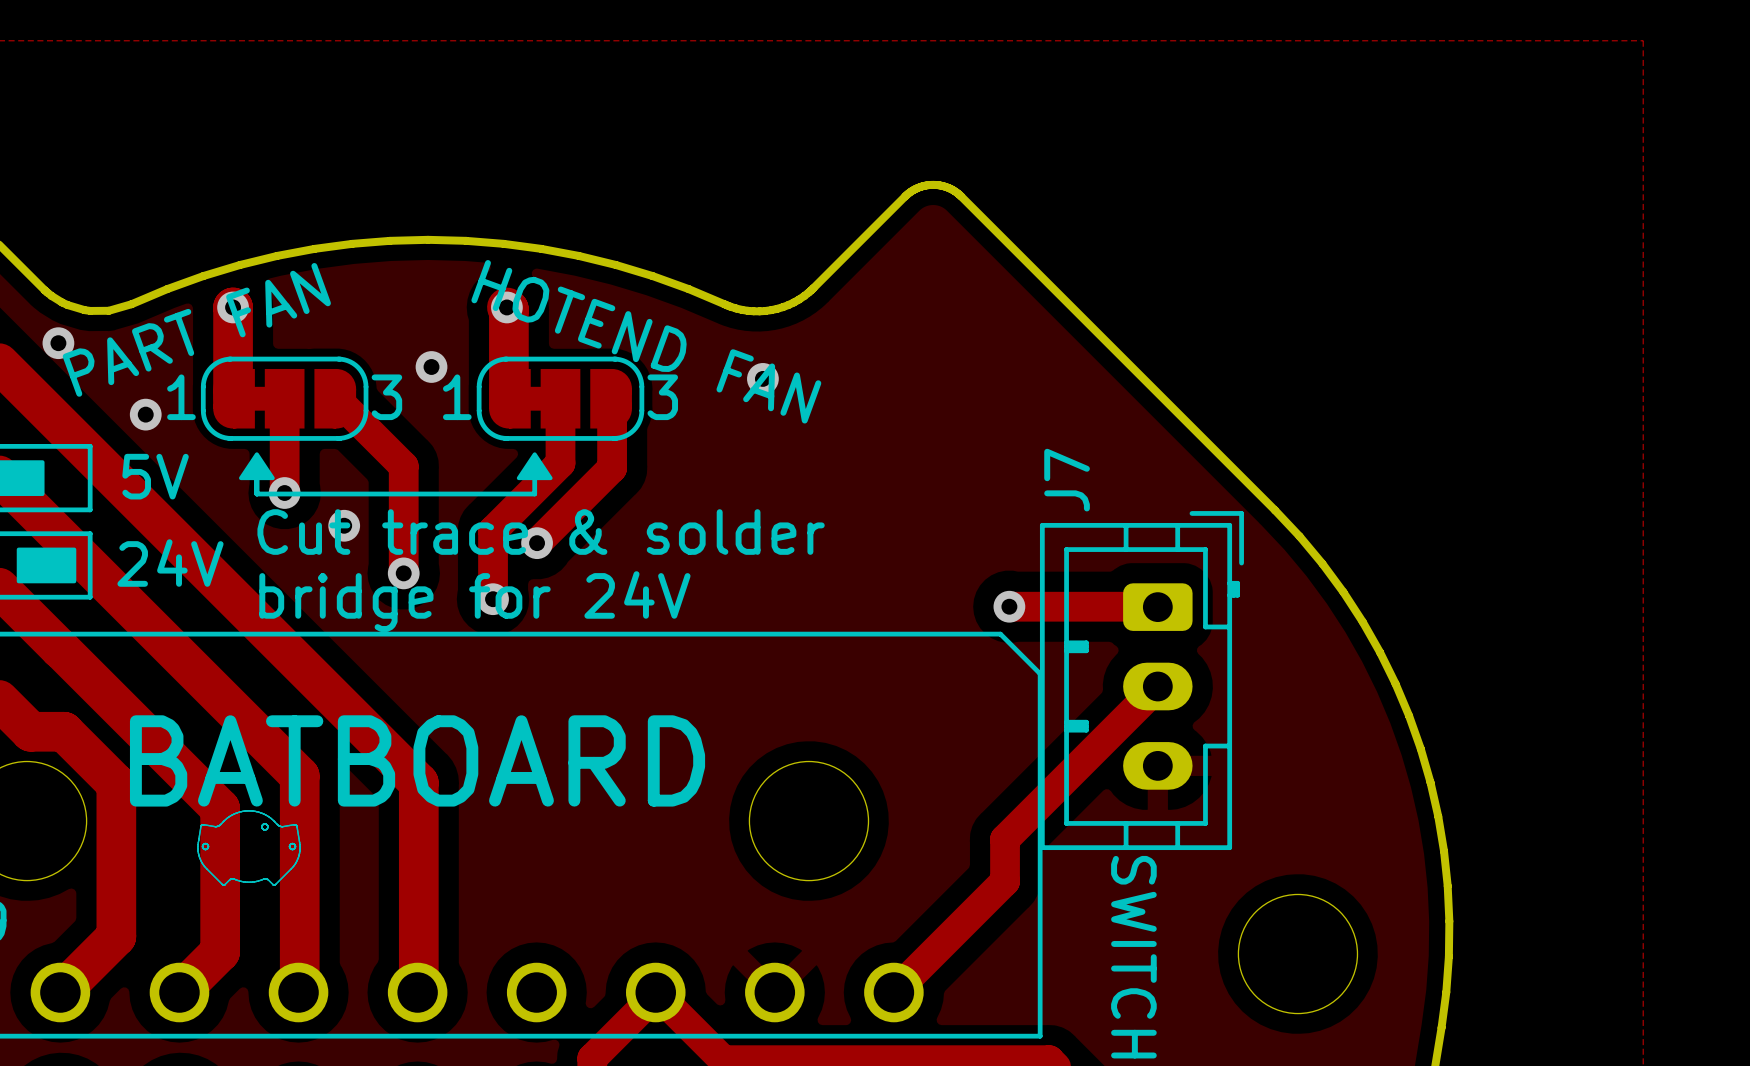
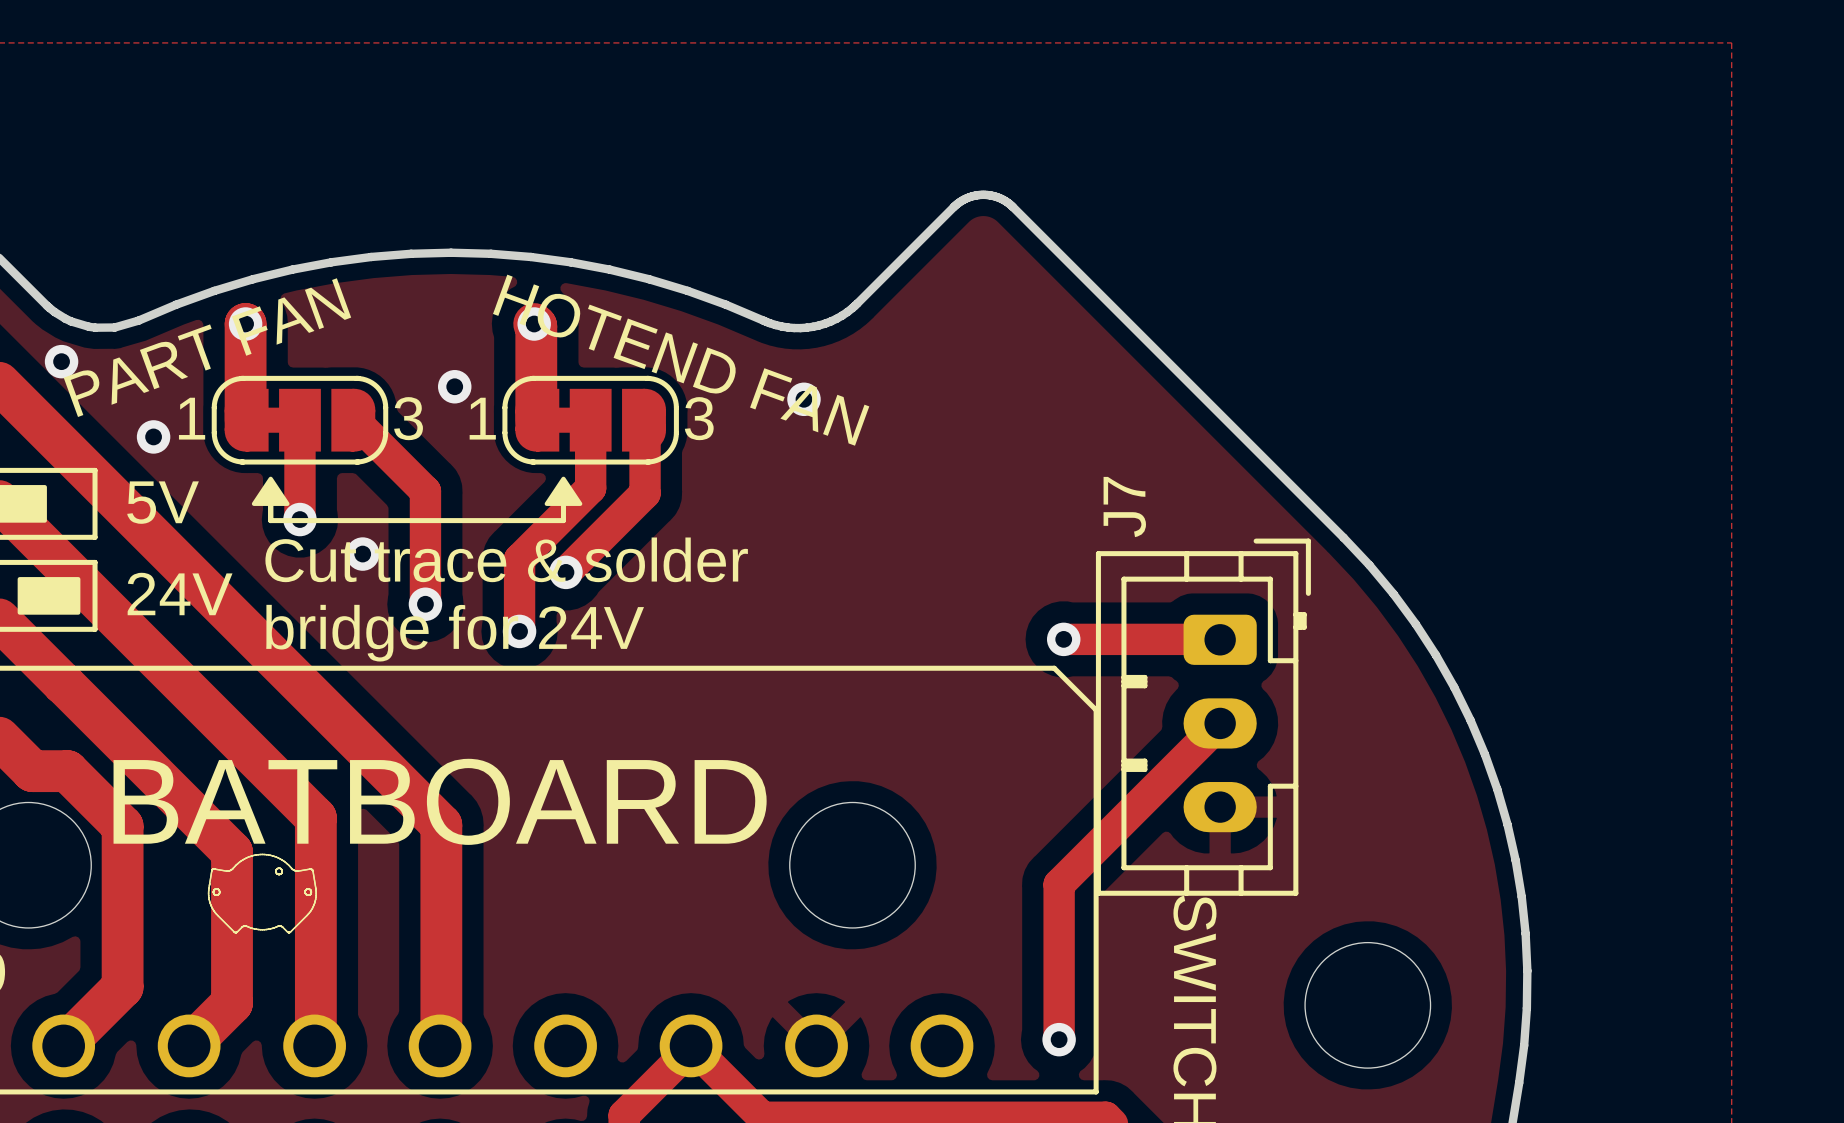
track: (1005, 881) (893, 992) -> (1059, 928) (1059, 1039)
via: none -> (1059, 1039)

